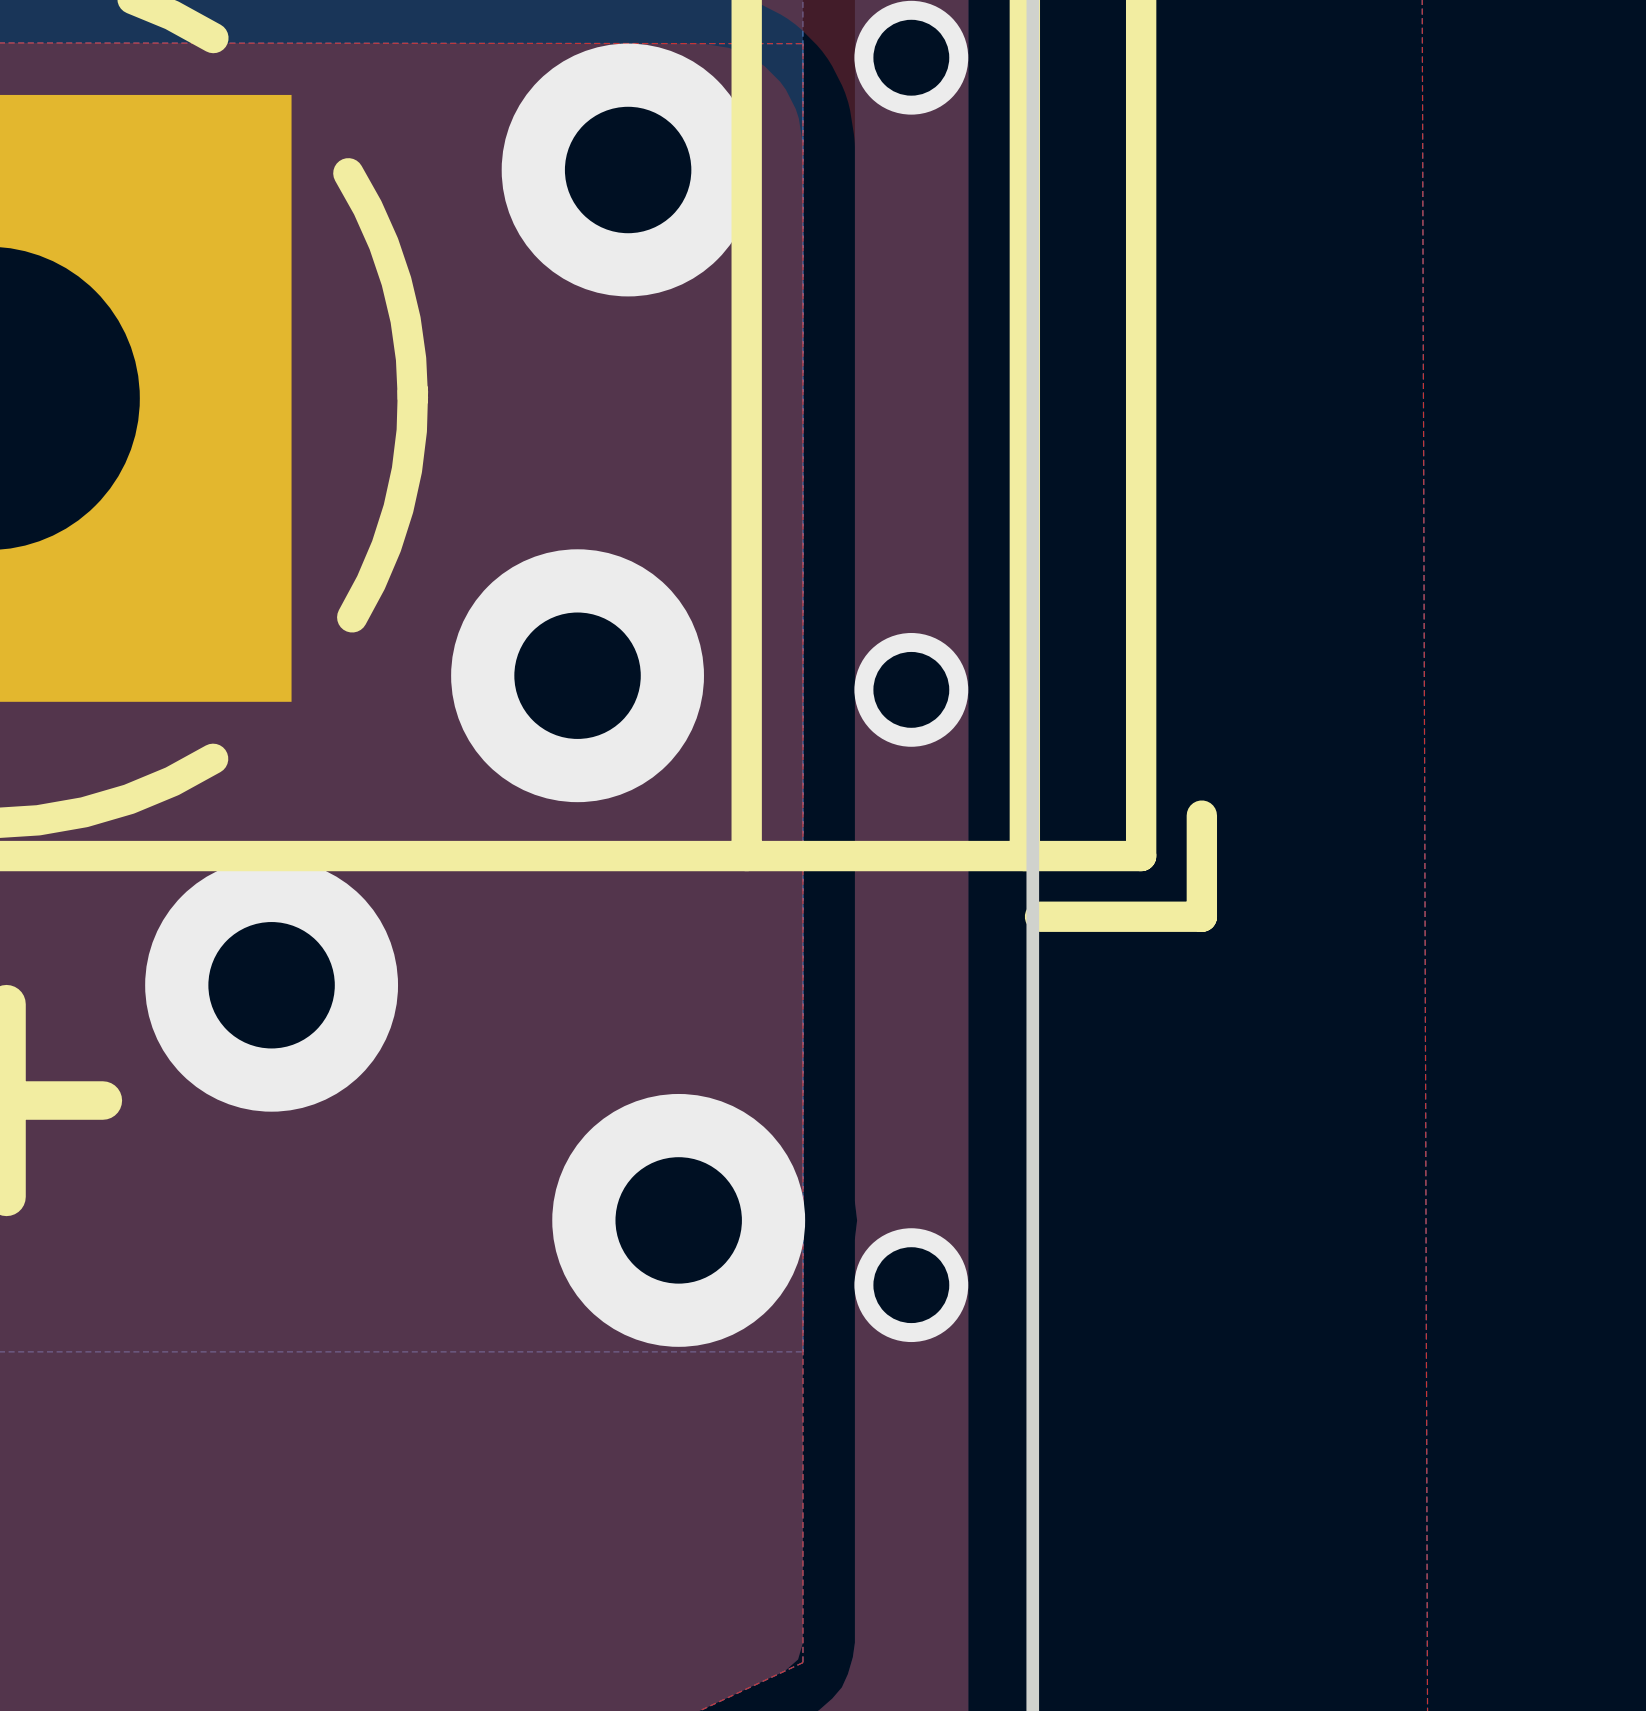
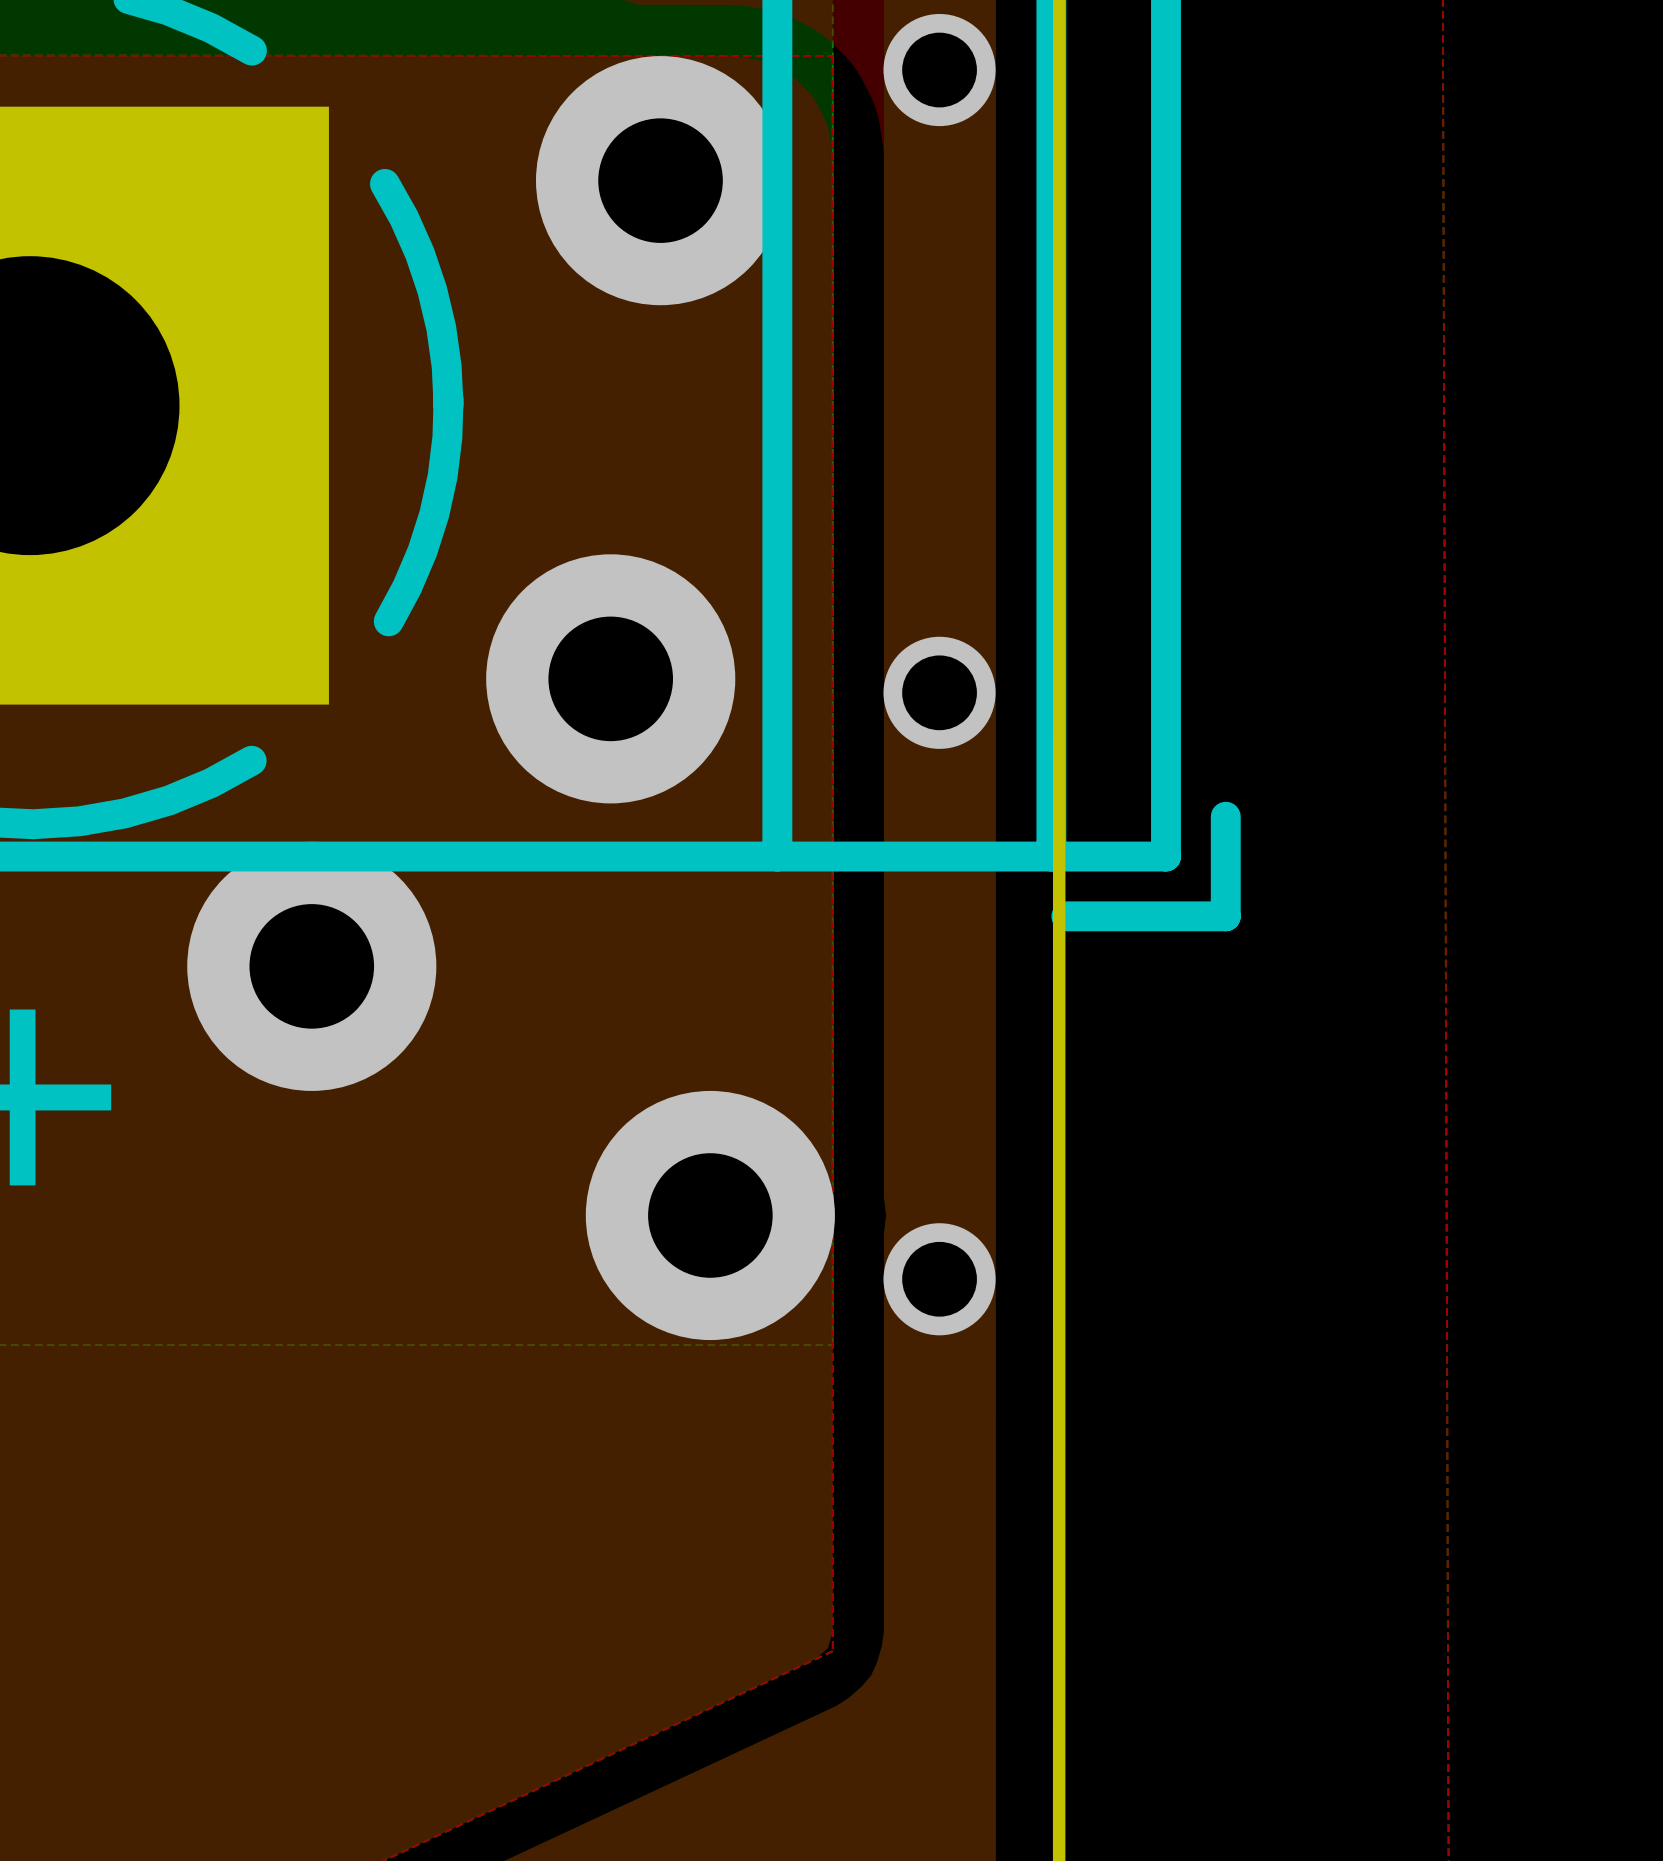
via position: (271, 985) -> (311, 966)

